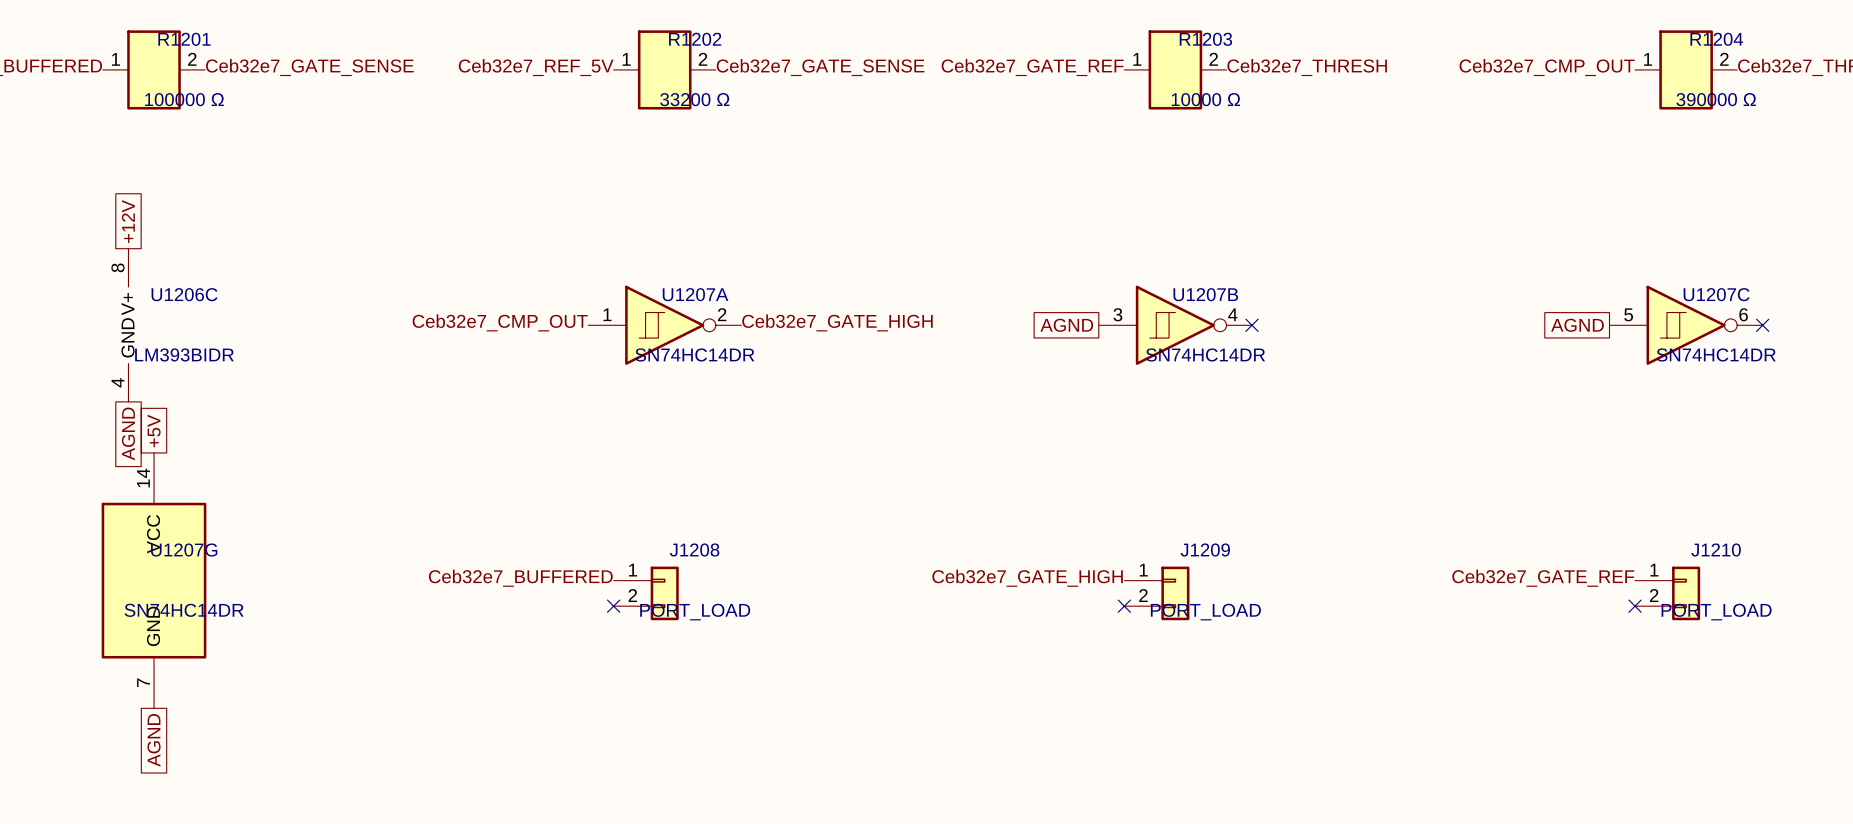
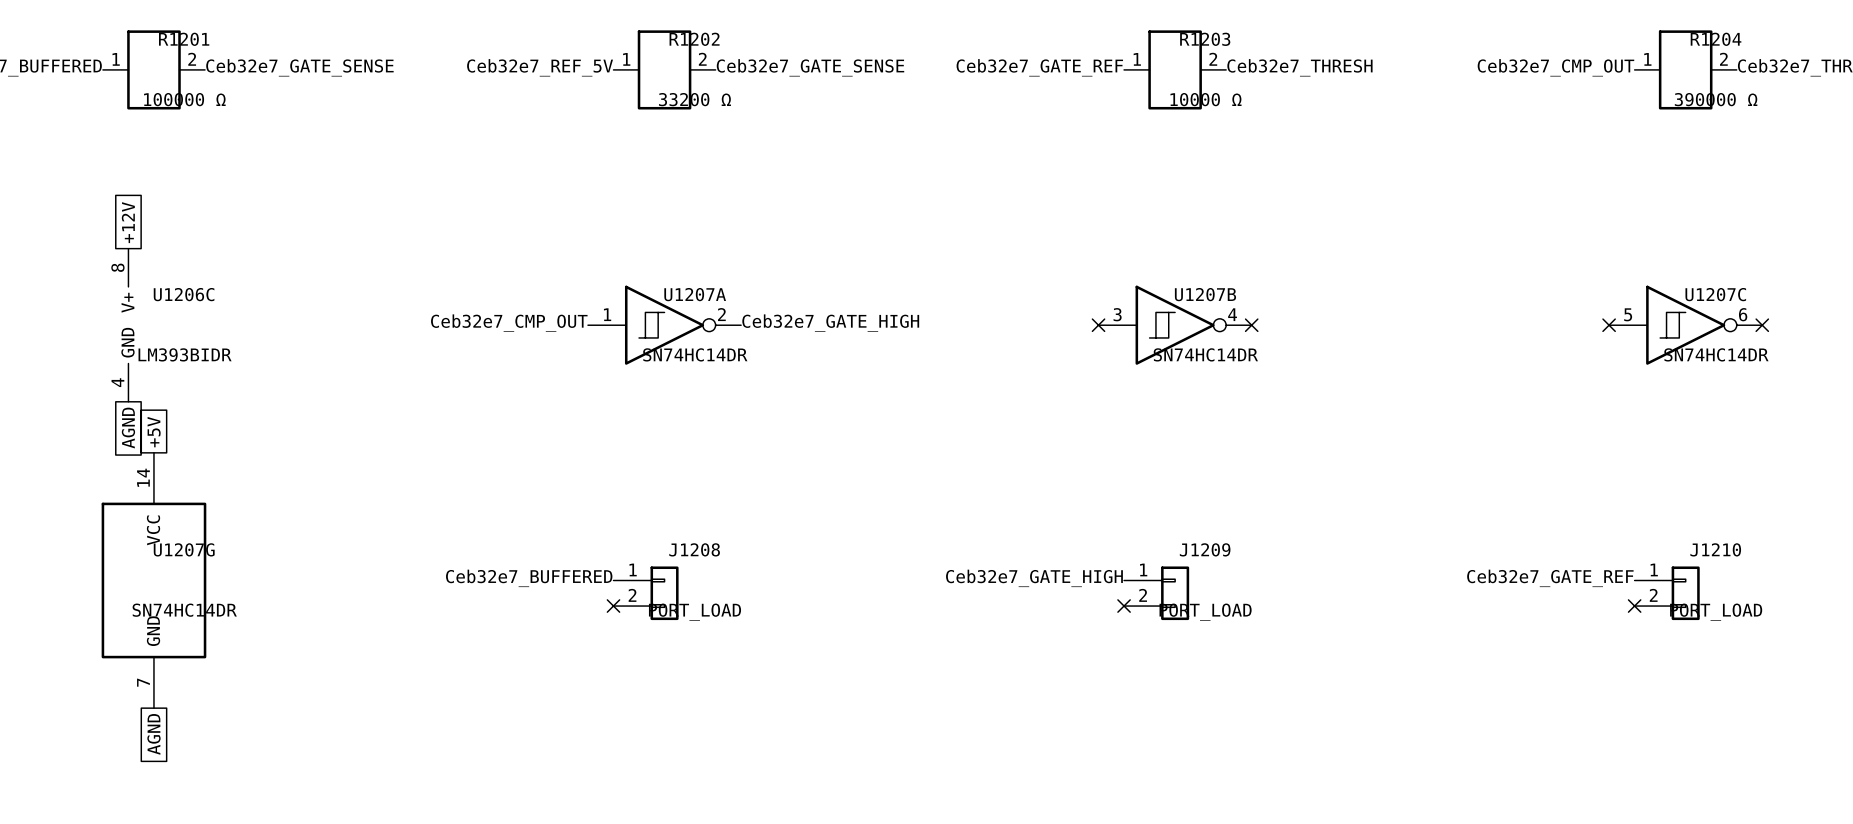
global label: AGND (1066, 325) -> none
no-connect mark: none -> (1098, 325)
global label: AGND (1577, 325) -> none
no-connect mark: none -> (1609, 325)

